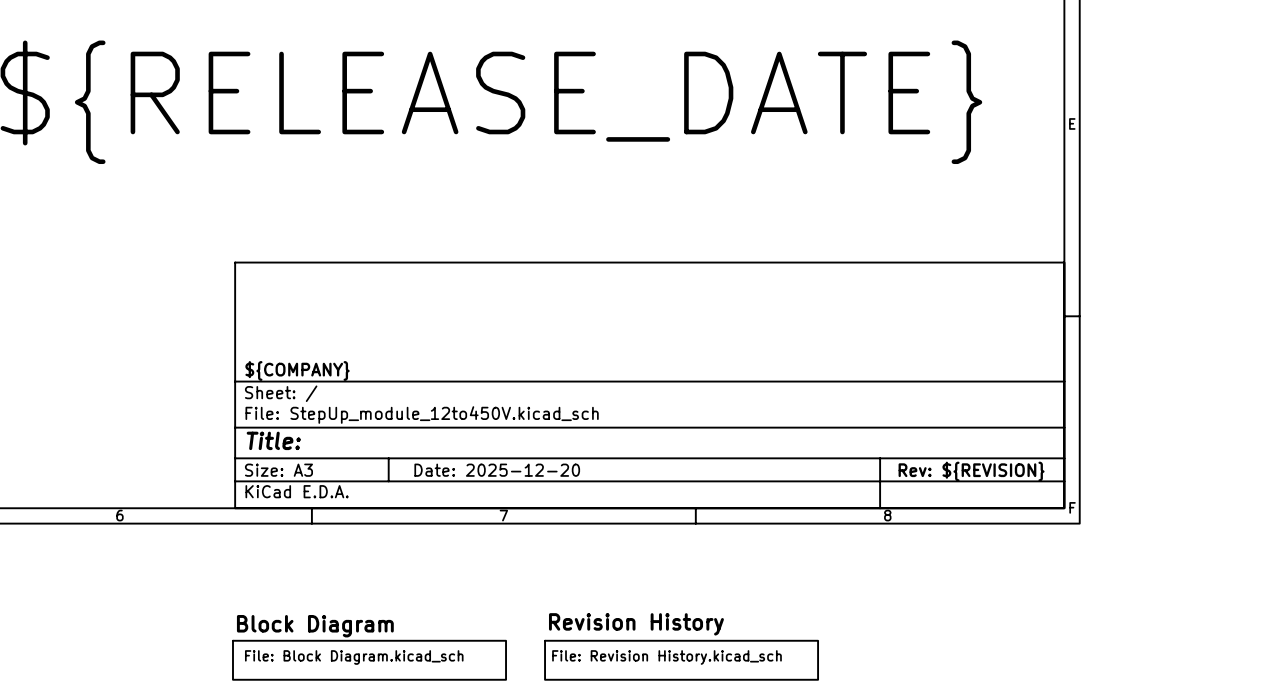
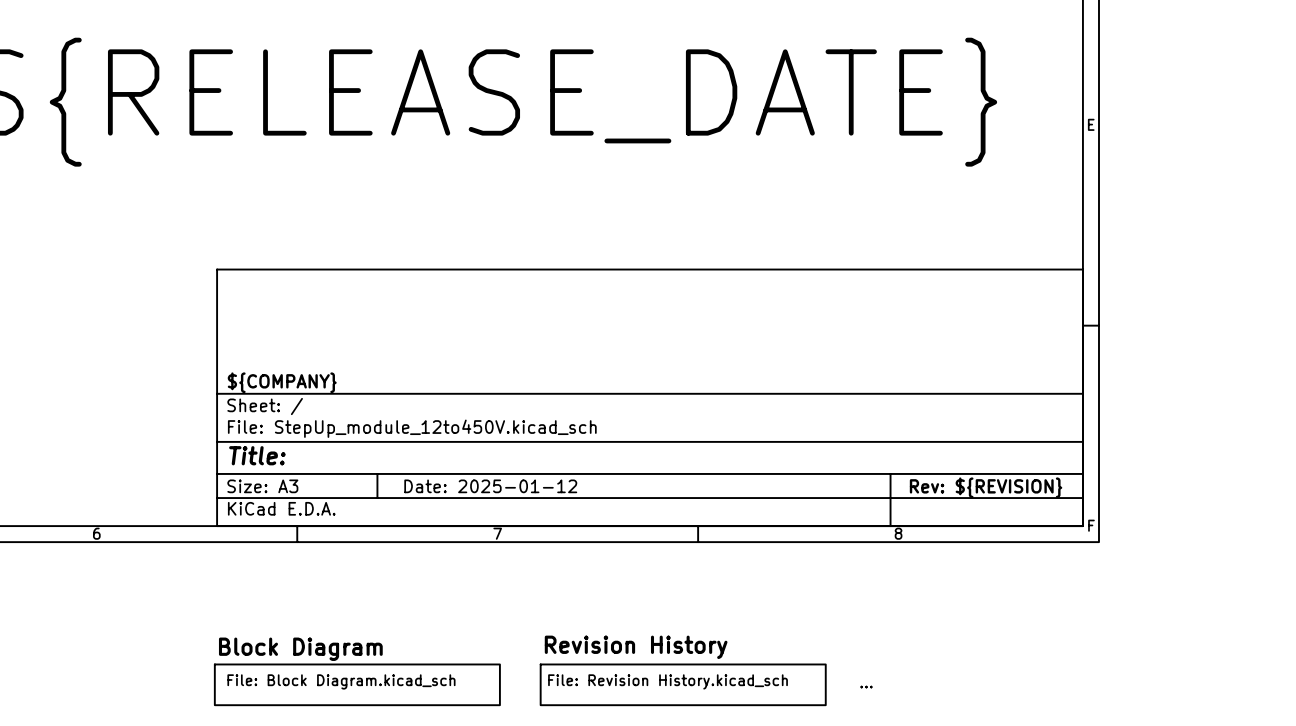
title block: Date: 2025-12-20 (497, 470) -> Date: 2025-01-12 (490, 486)
text: none -> ... (866, 687)

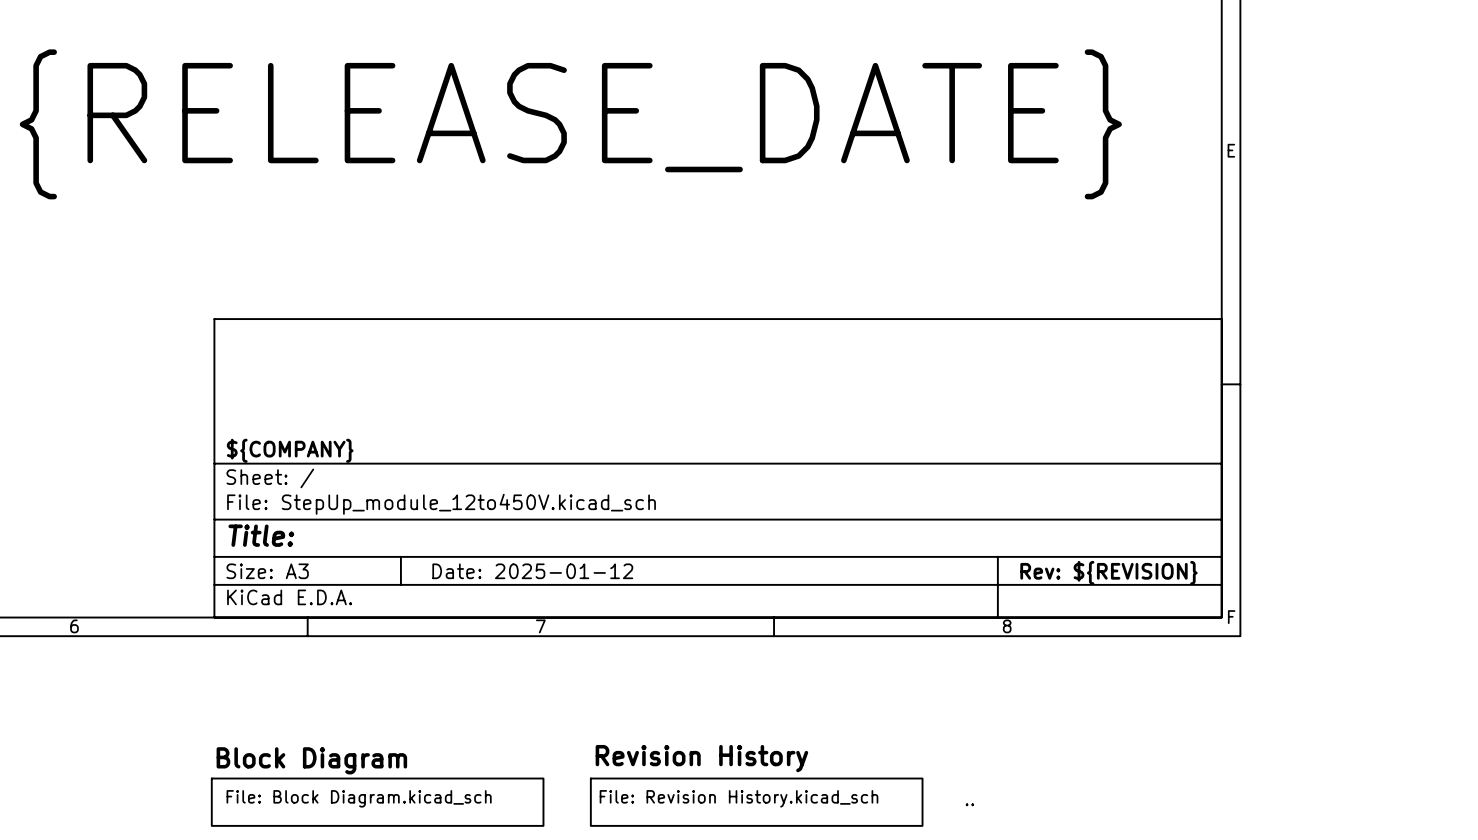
text: ... (866, 687) -> .. (969, 804)

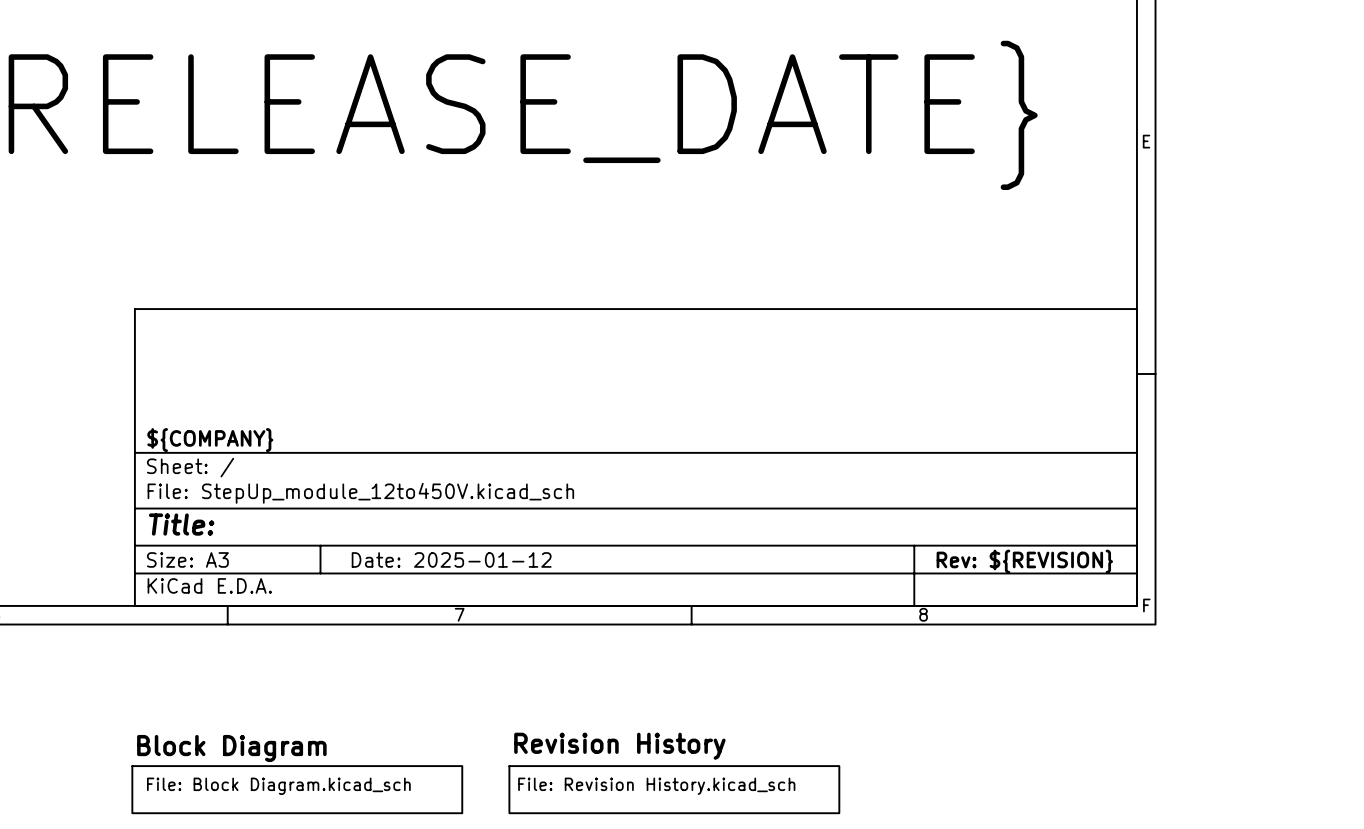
text: .. (969, 804) -> none

